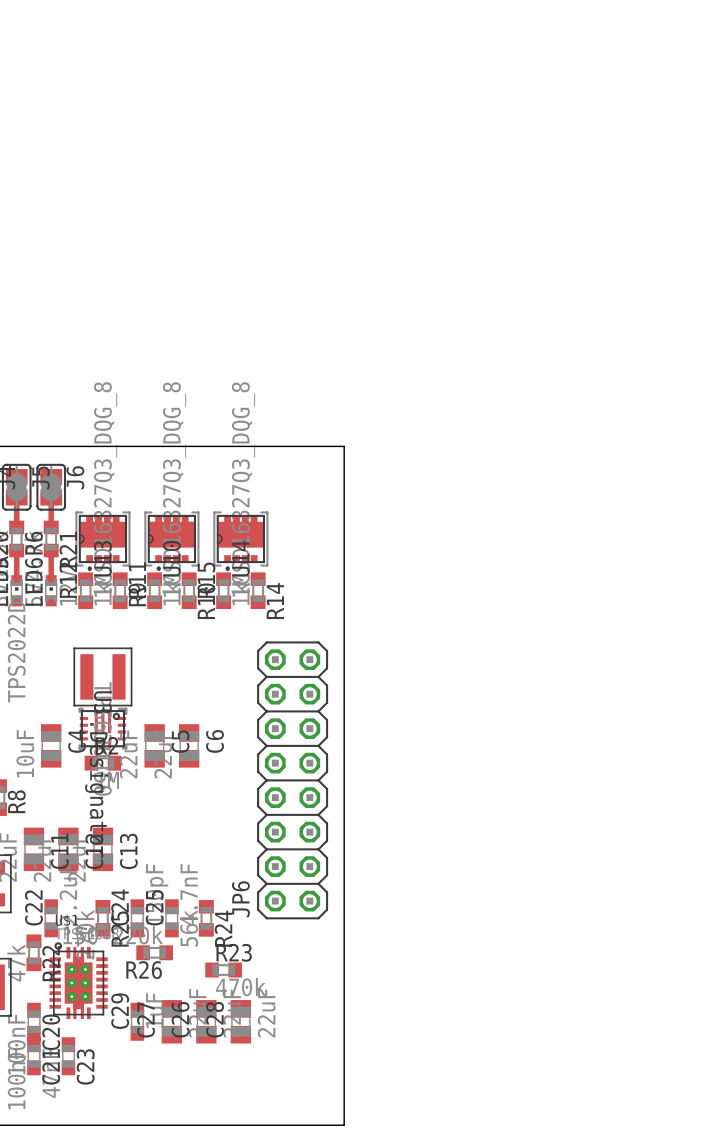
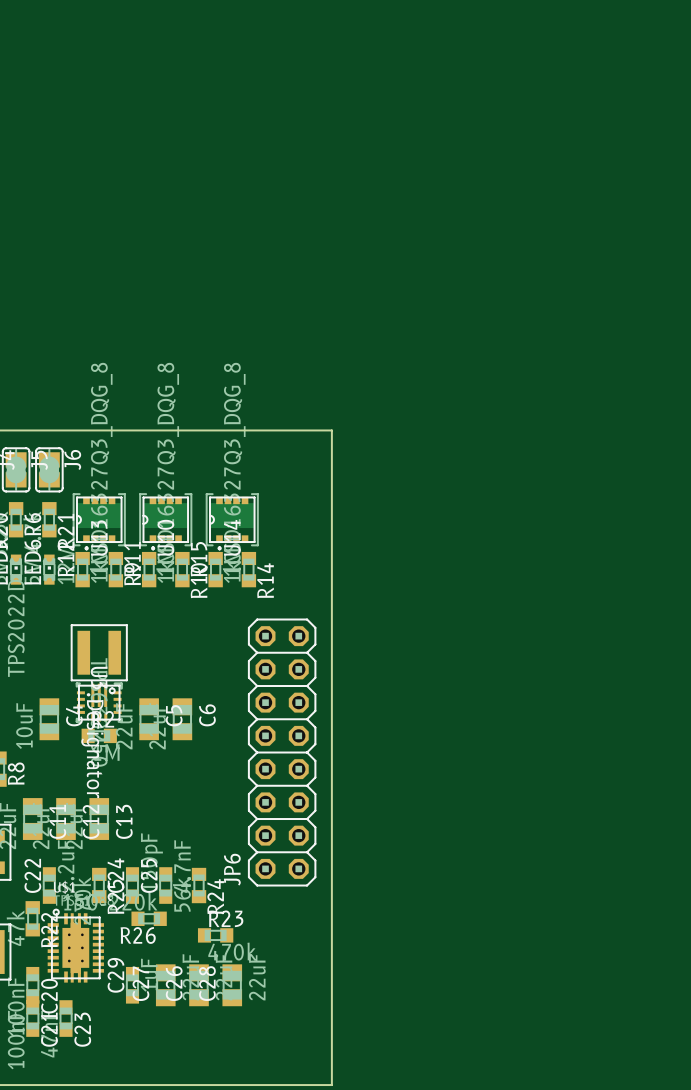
track: (16, 497) (16, 527) -> none
track: (51, 497) (51, 527) -> none
track: (16, 550) (16, 580) -> none
track: (51, 550) (51, 580) -> none

